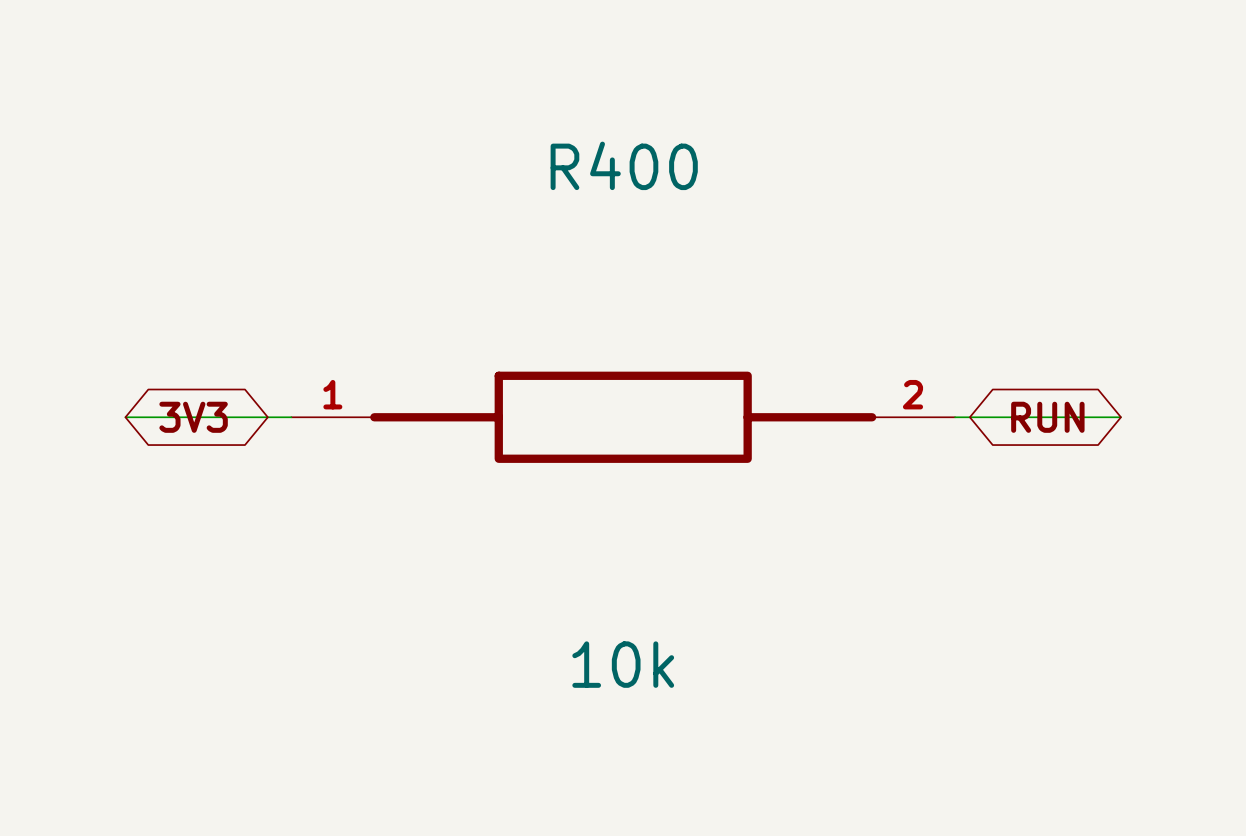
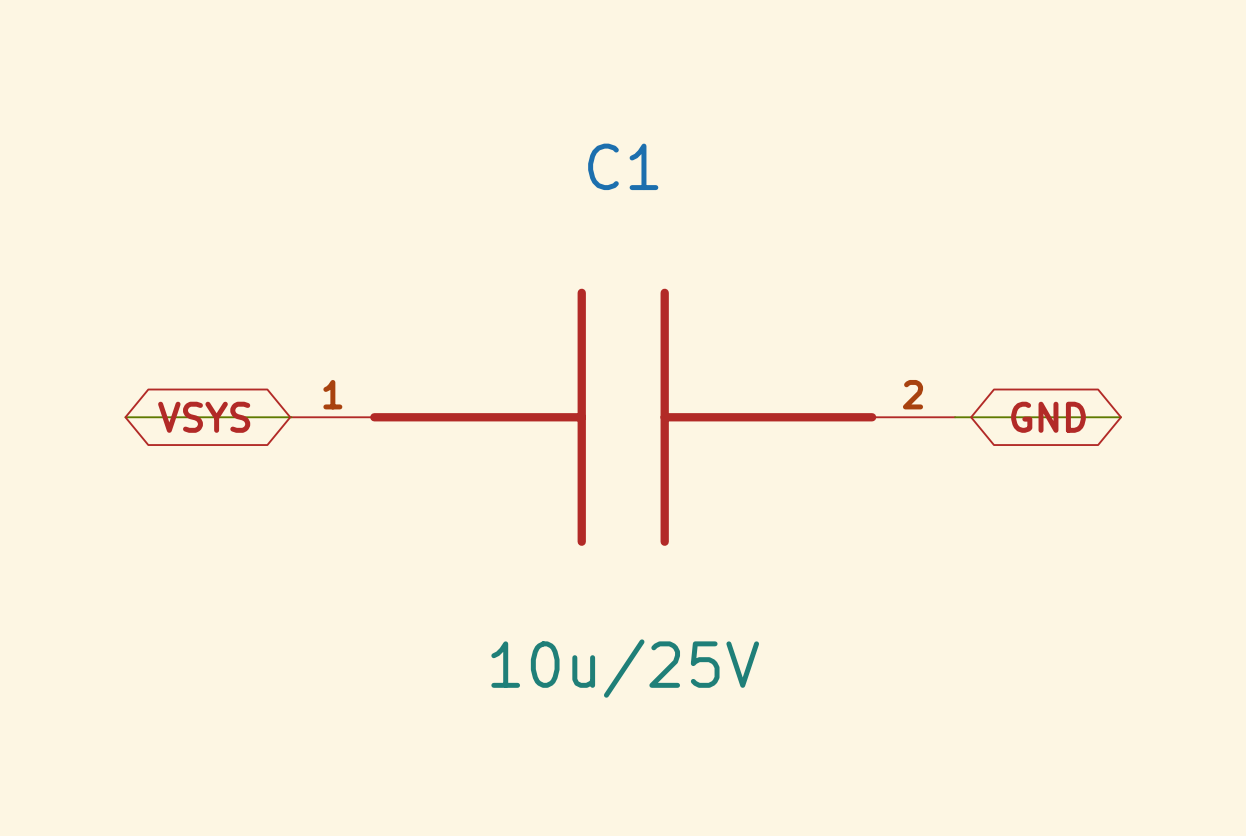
global label: 3V3 (193, 417) -> VSYS (204, 417)
R400: 10k (623, 417) -> none
C1: none -> 10u/25V (623, 417)
global label: RUN (1047, 417) -> GND (1048, 417)

